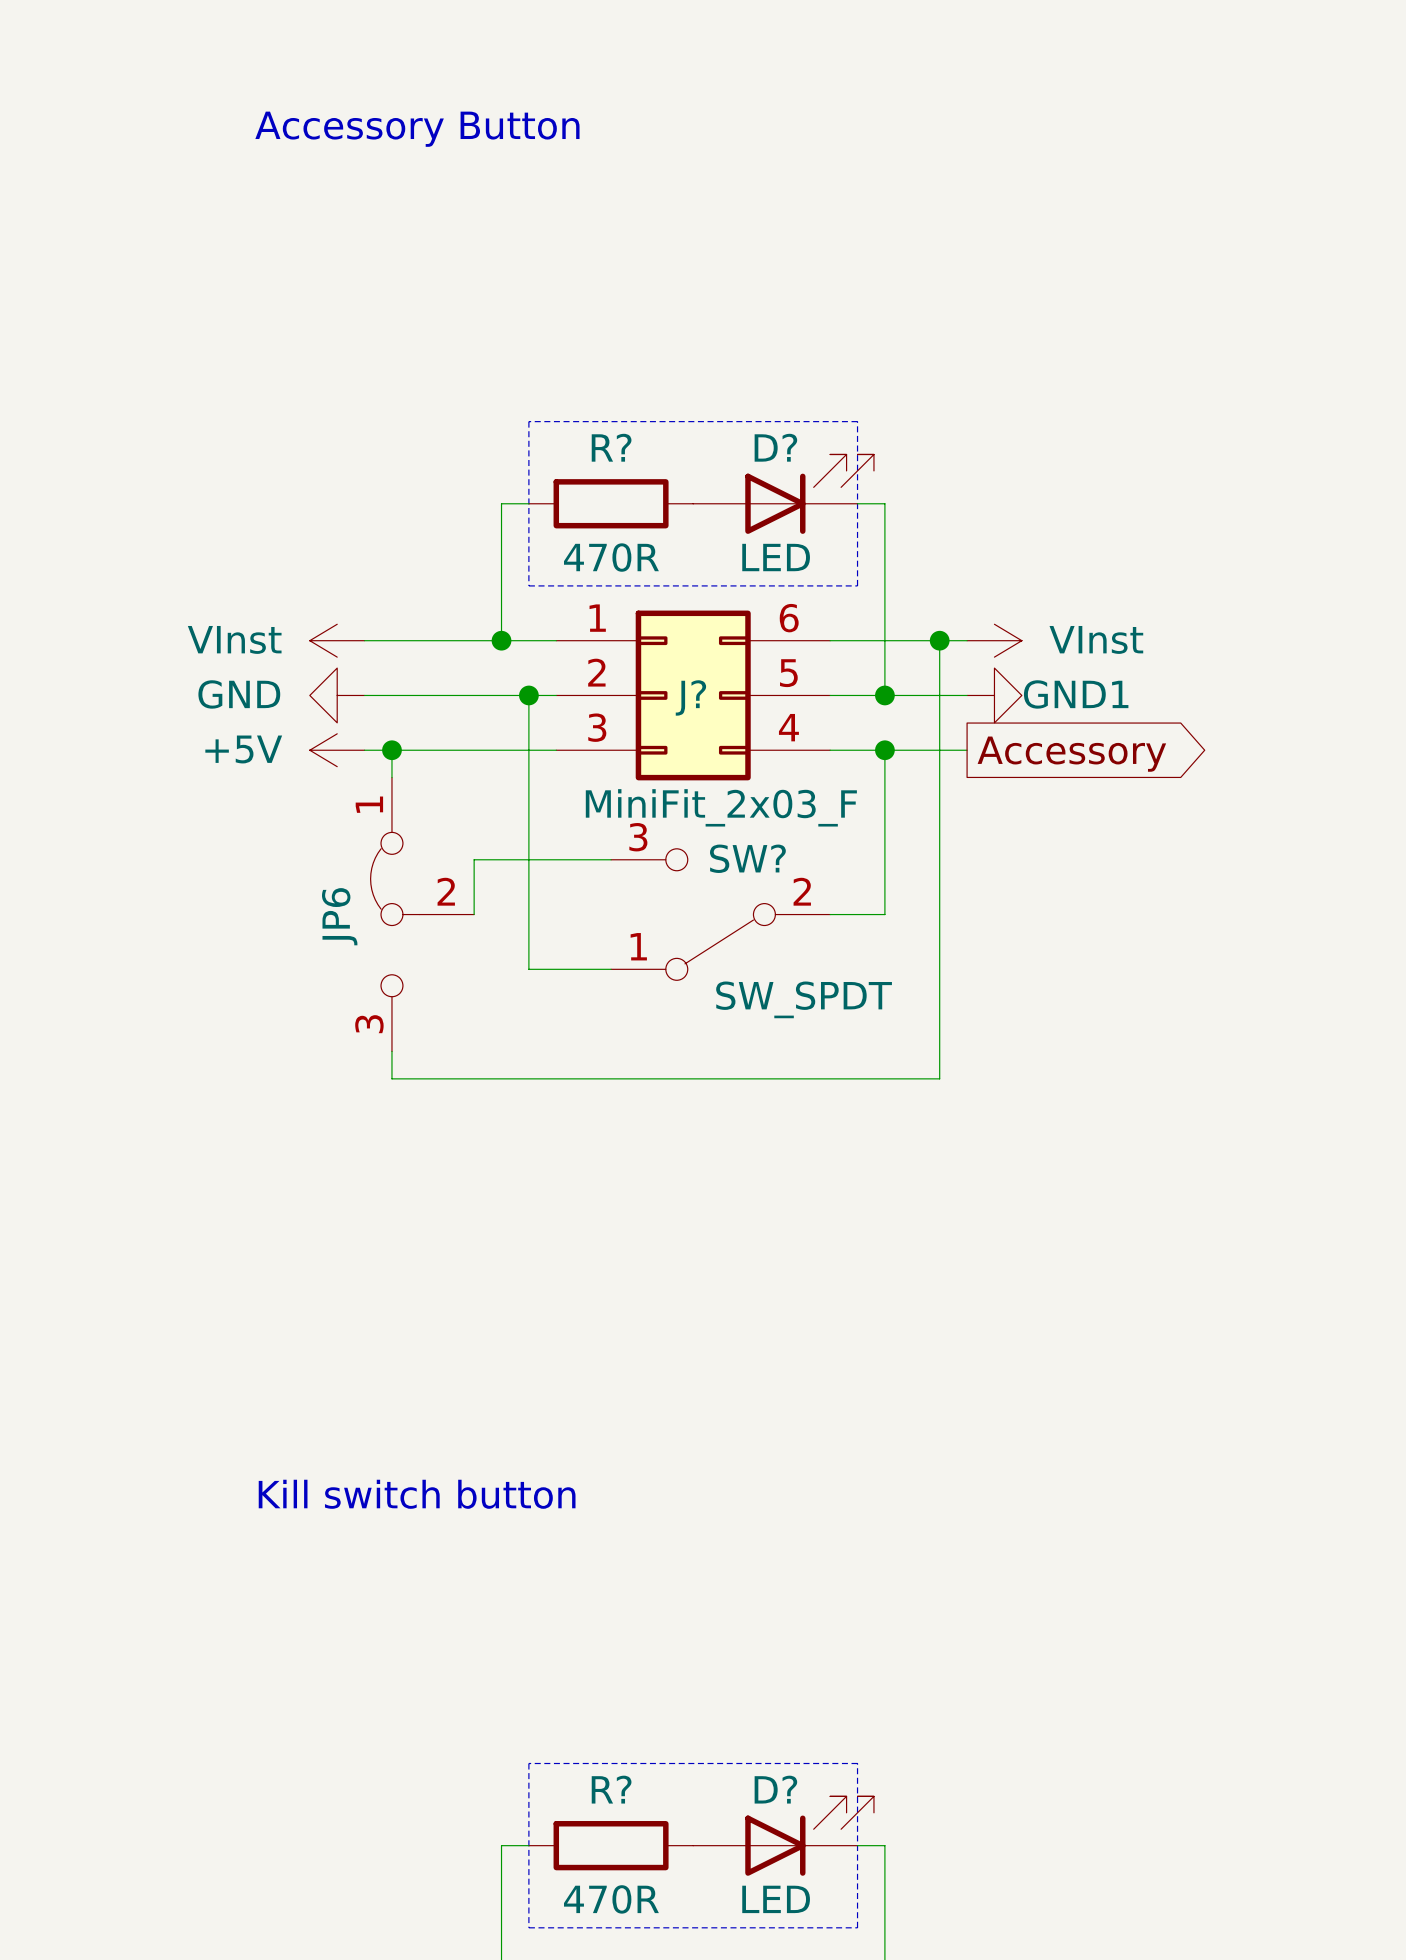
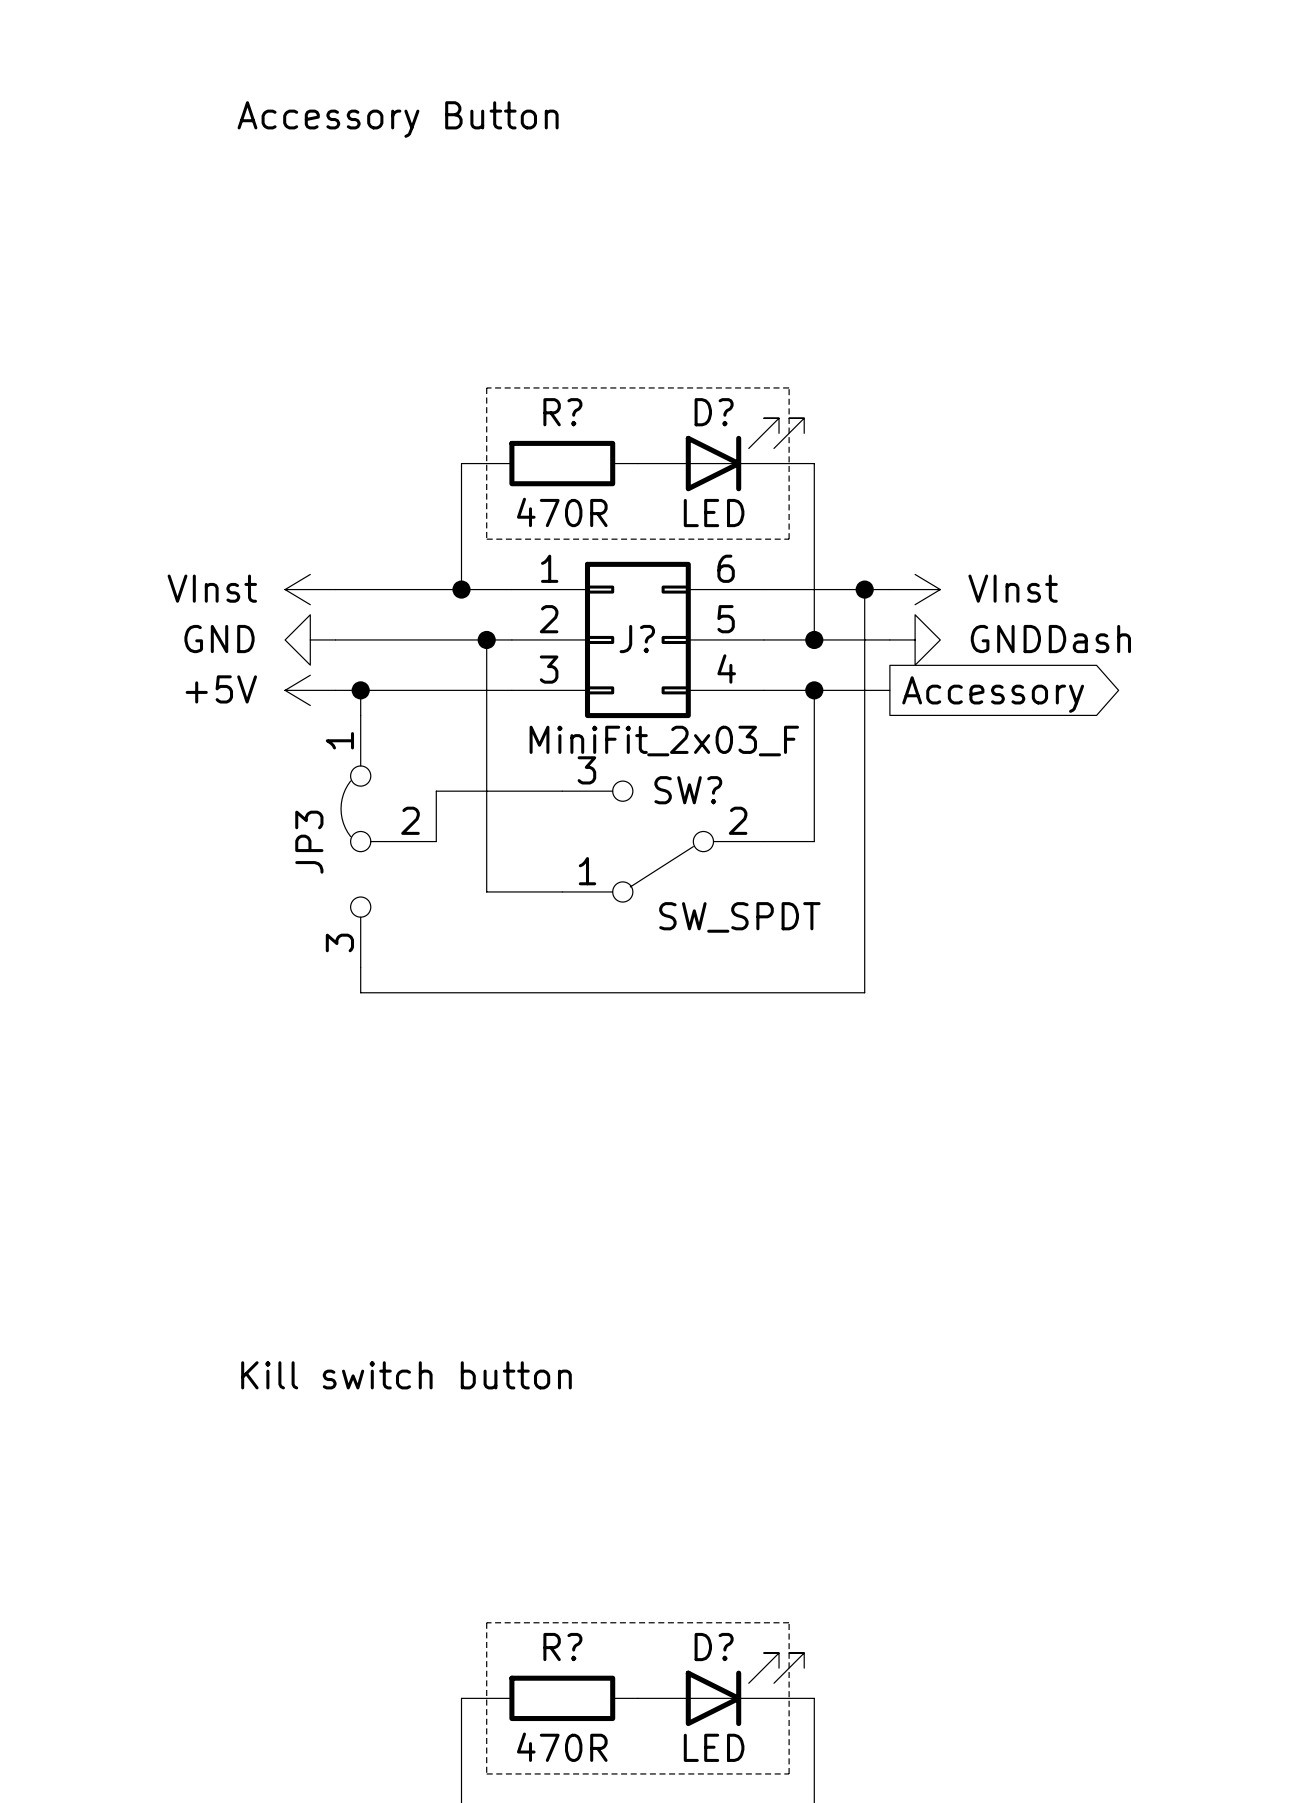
power symbol: GND1 (994, 695) -> GNDDash (915, 639)
JP6 name: JP6 (339, 916) -> JP3 (309, 842)

